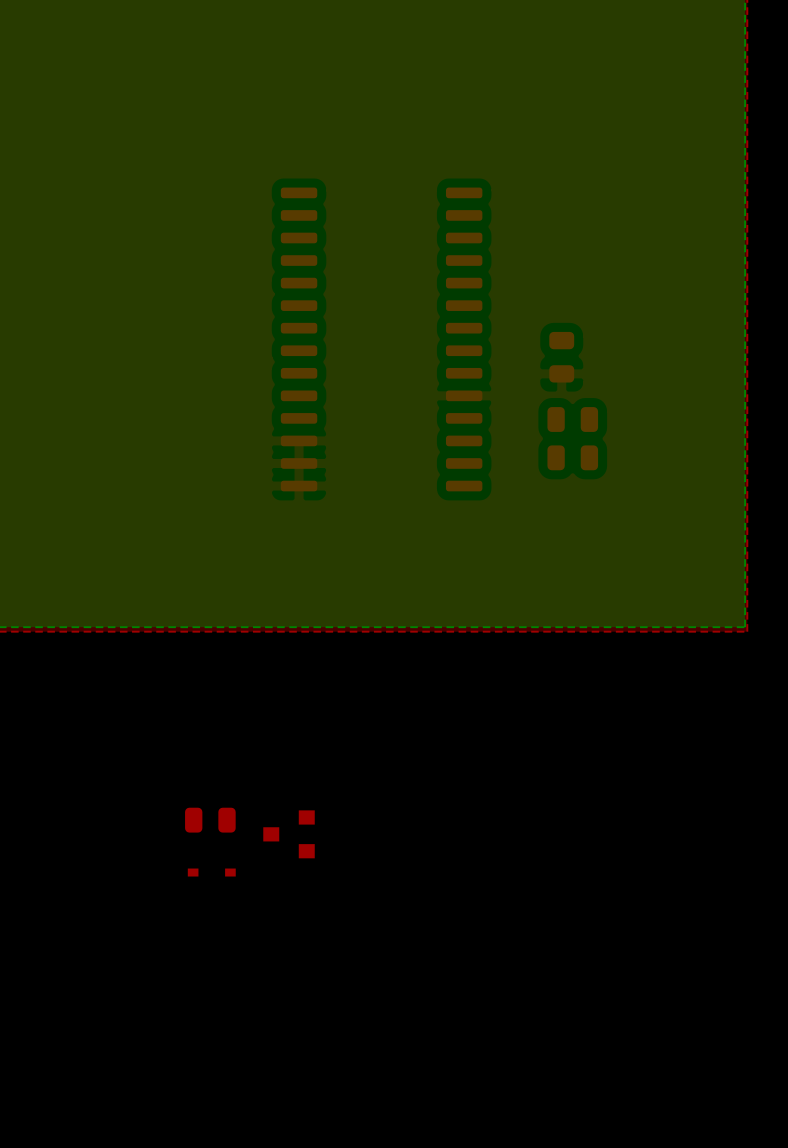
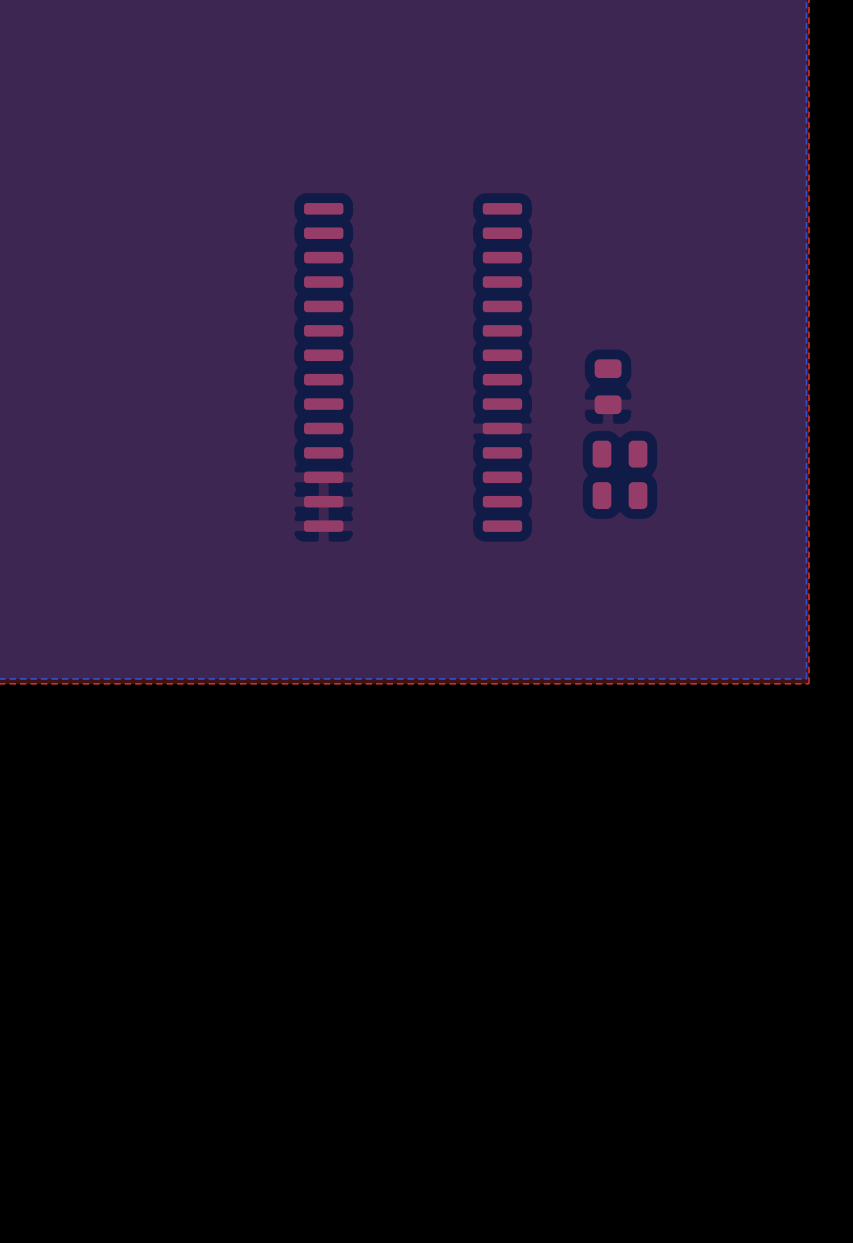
part: (210, 820) -> none
part: (289, 834) -> none
part: (211, 872) -> none

